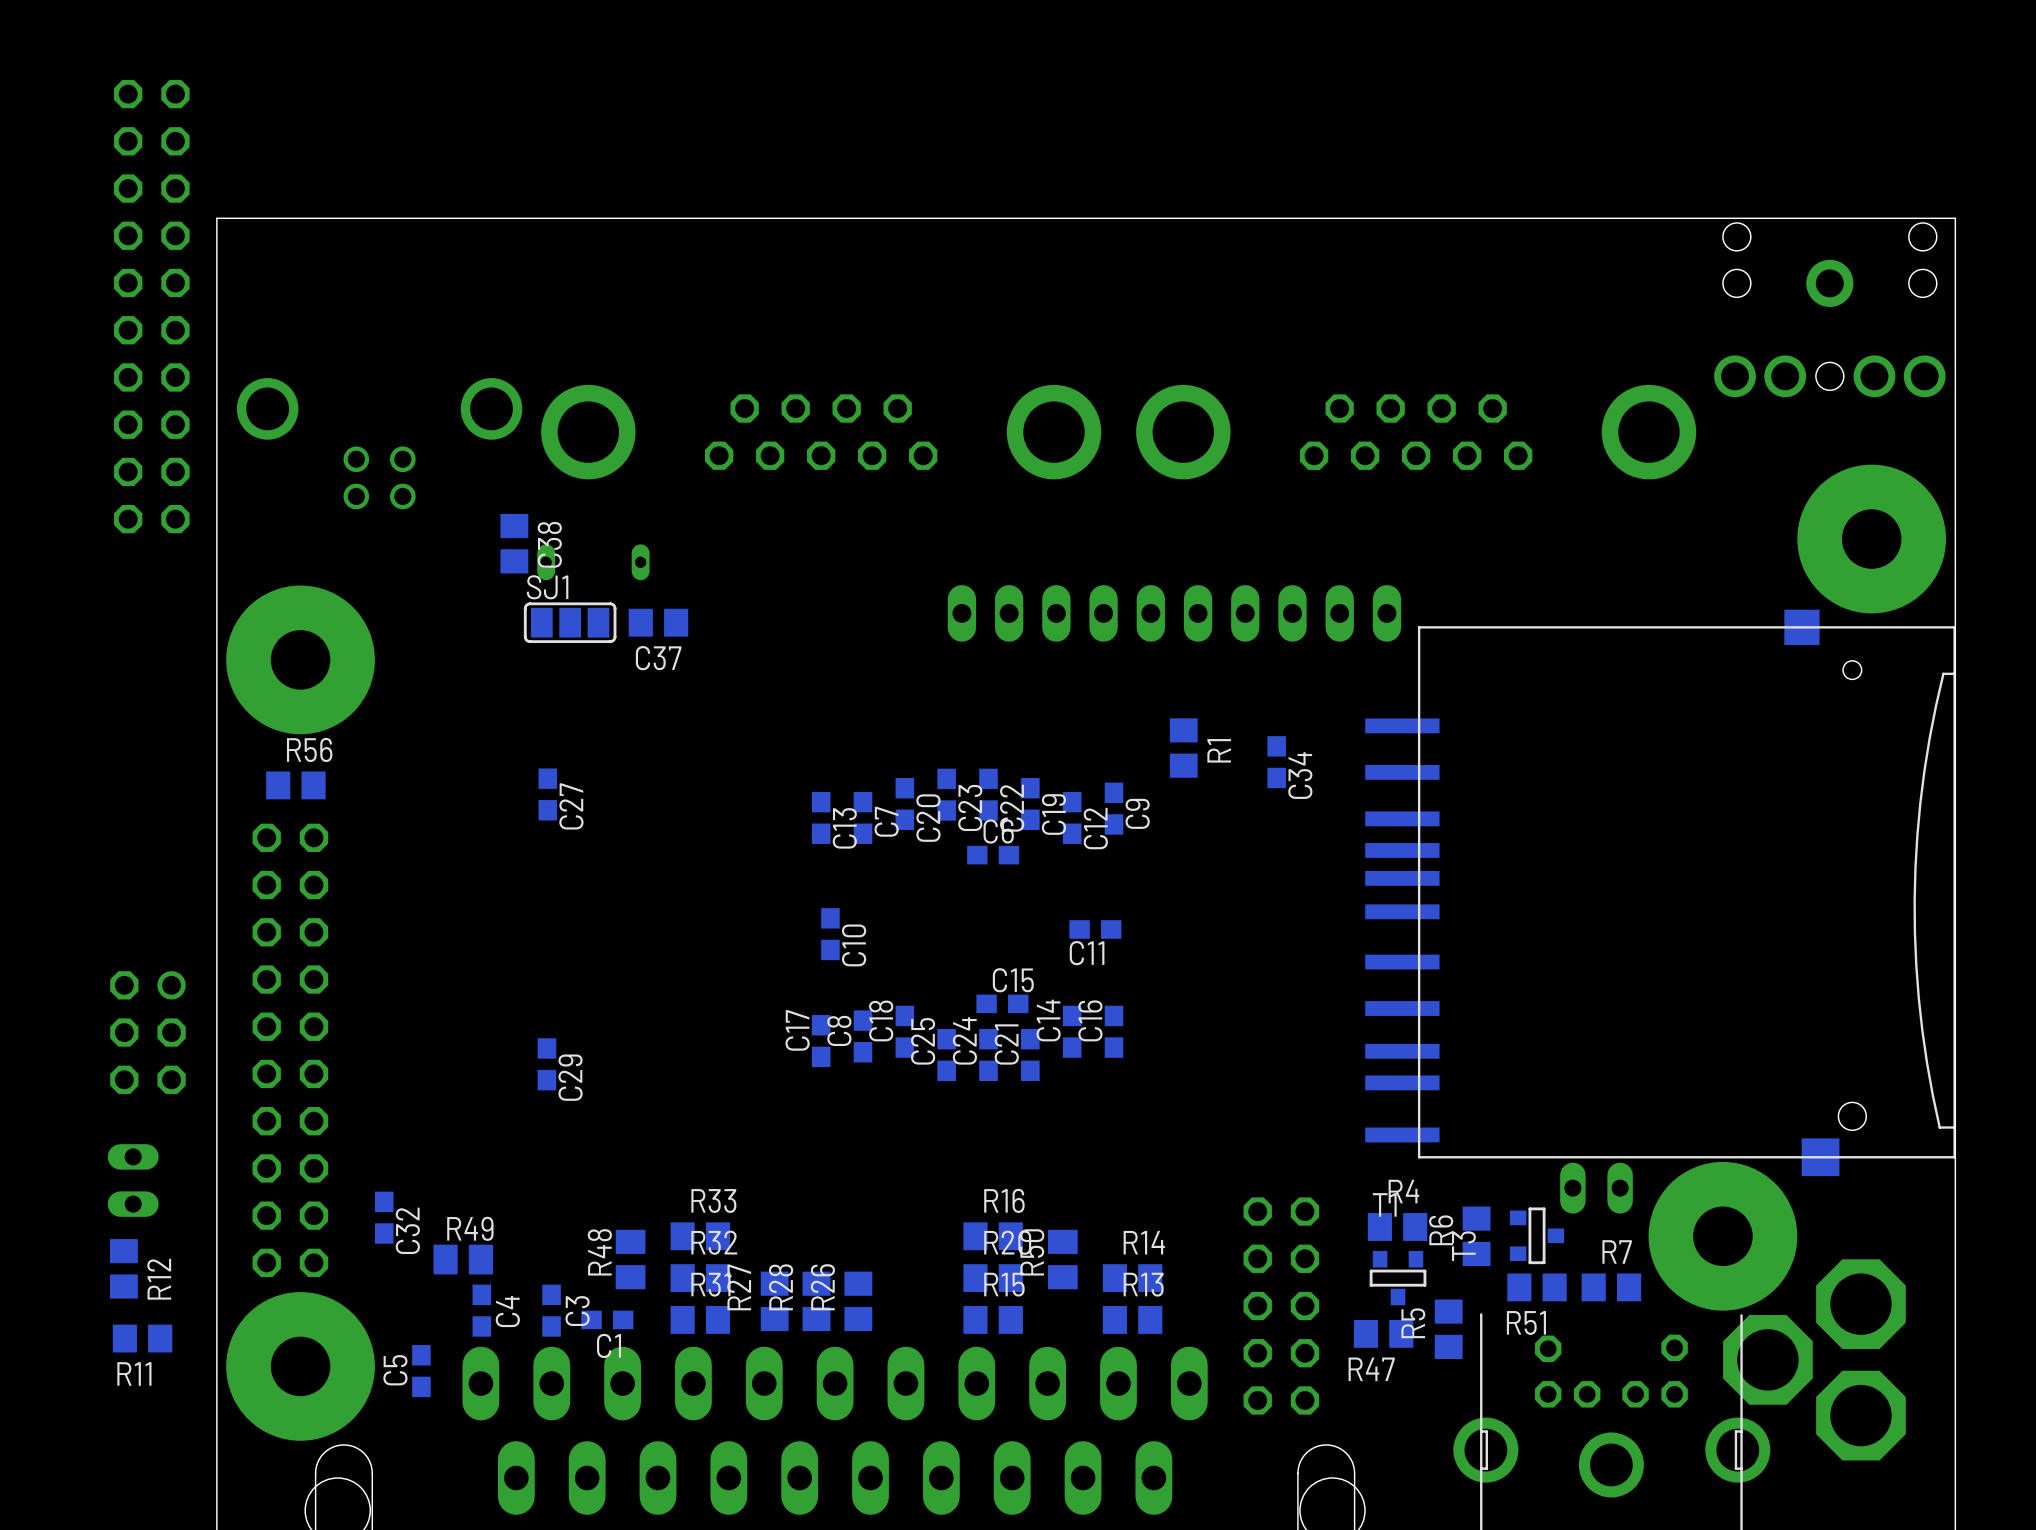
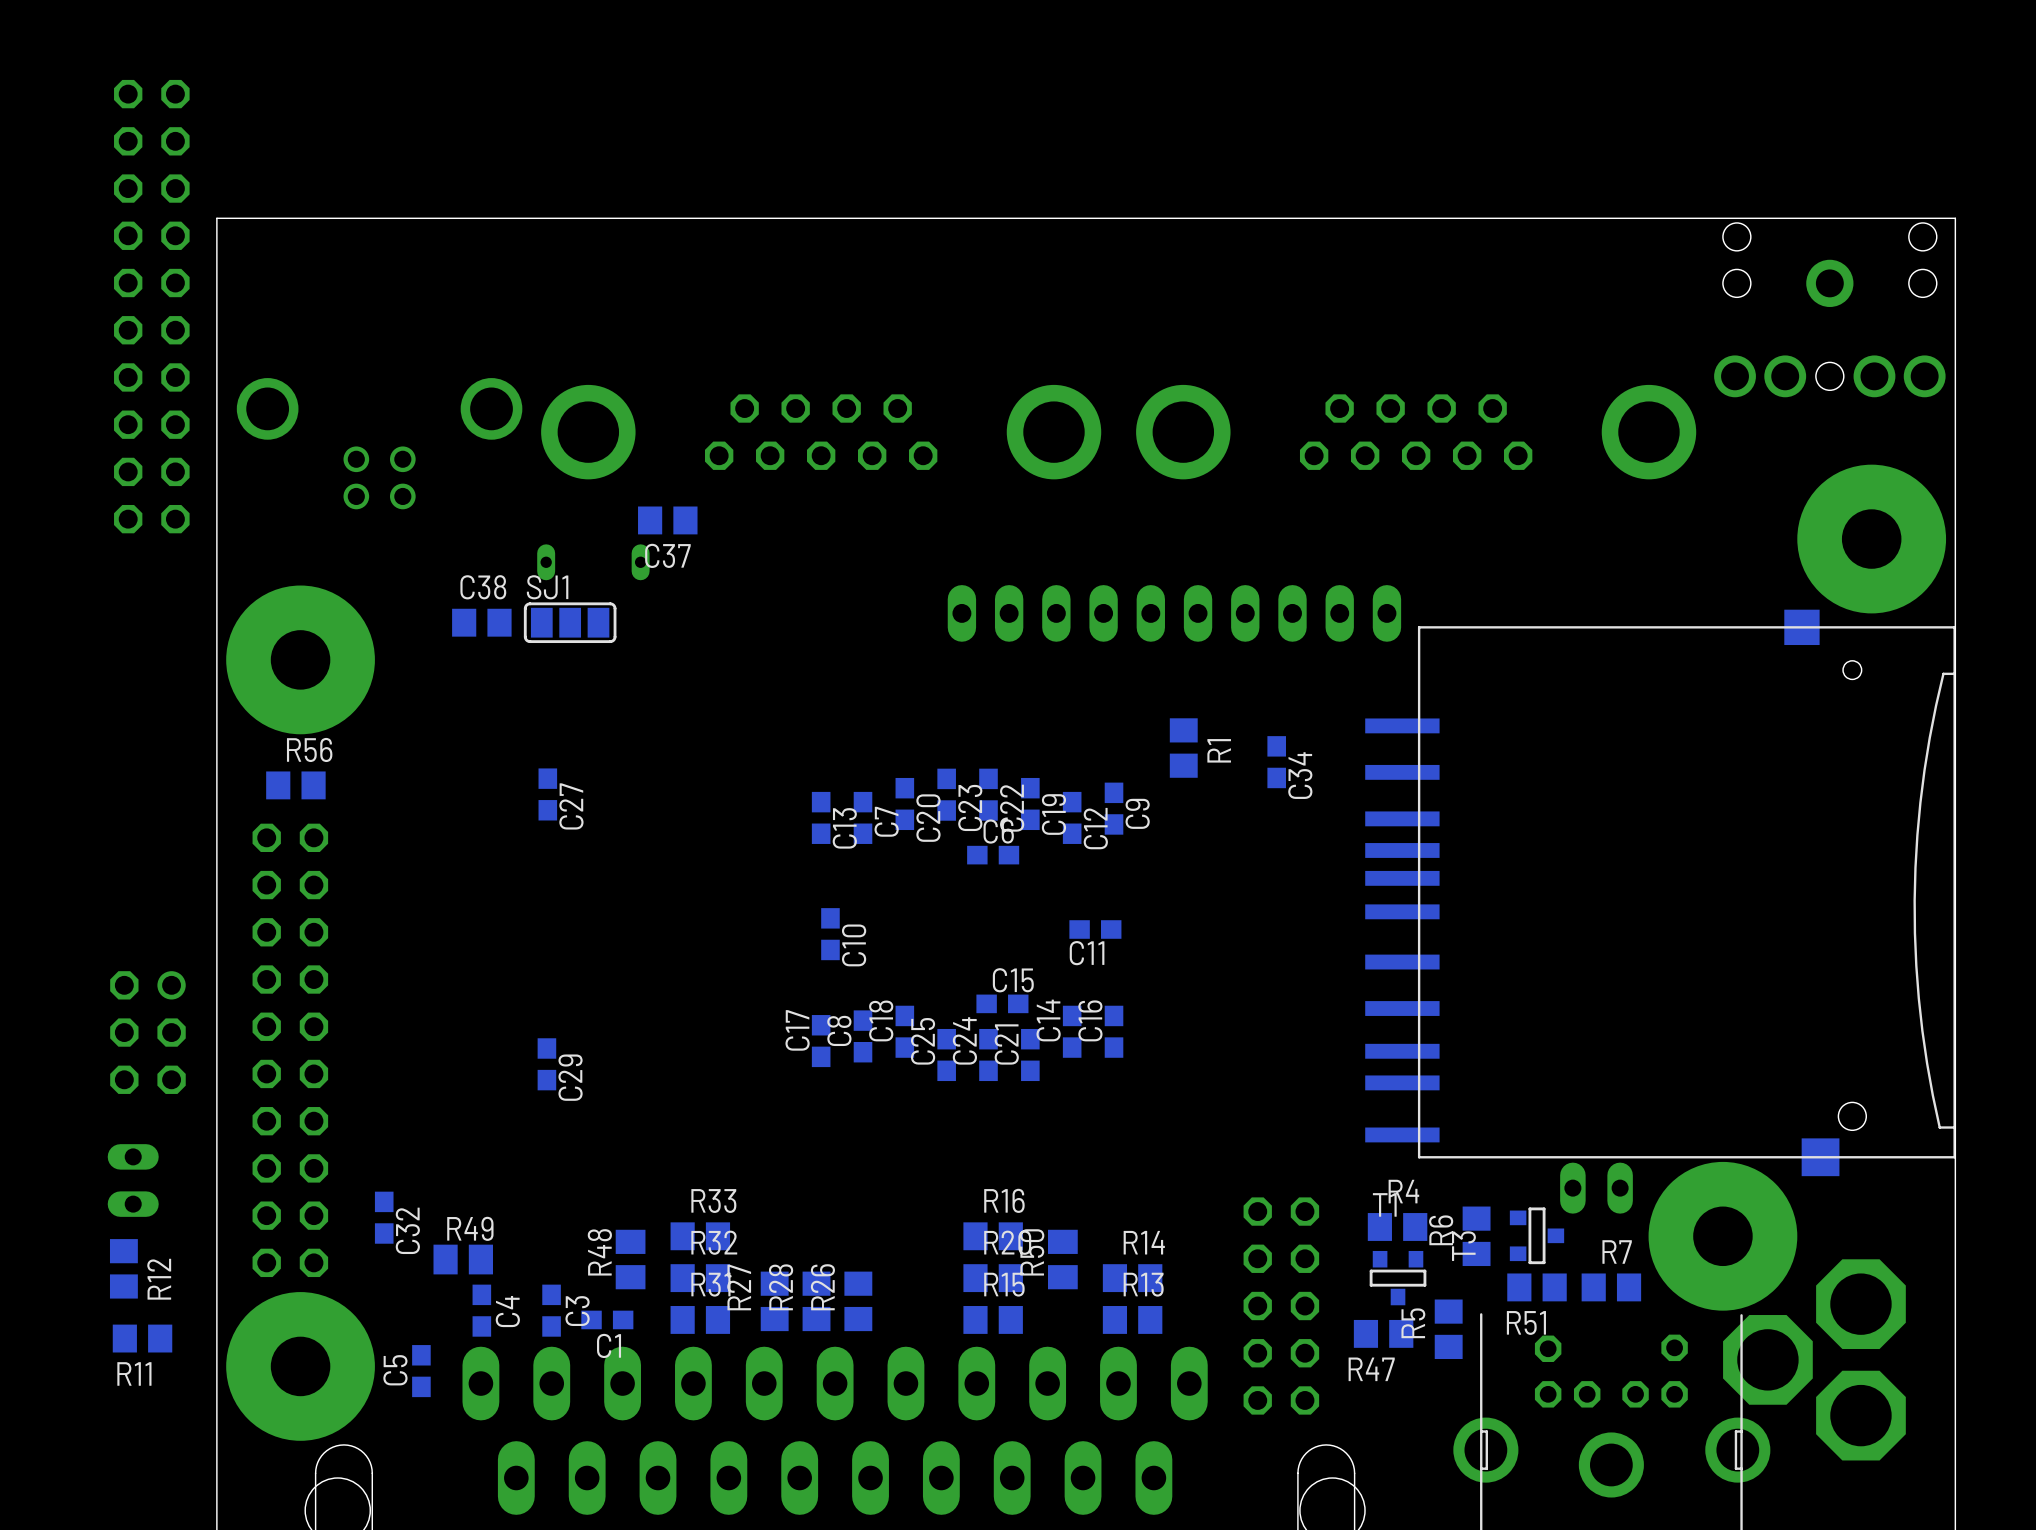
C38 rotation: 0° (514, 543) -> 90° clockwise (481, 622)
C38 position: (514, 543) -> (481, 622)
C38 name position: C38 (549, 544) -> C38 (483, 587)
C37 position: (658, 622) -> (667, 520)

